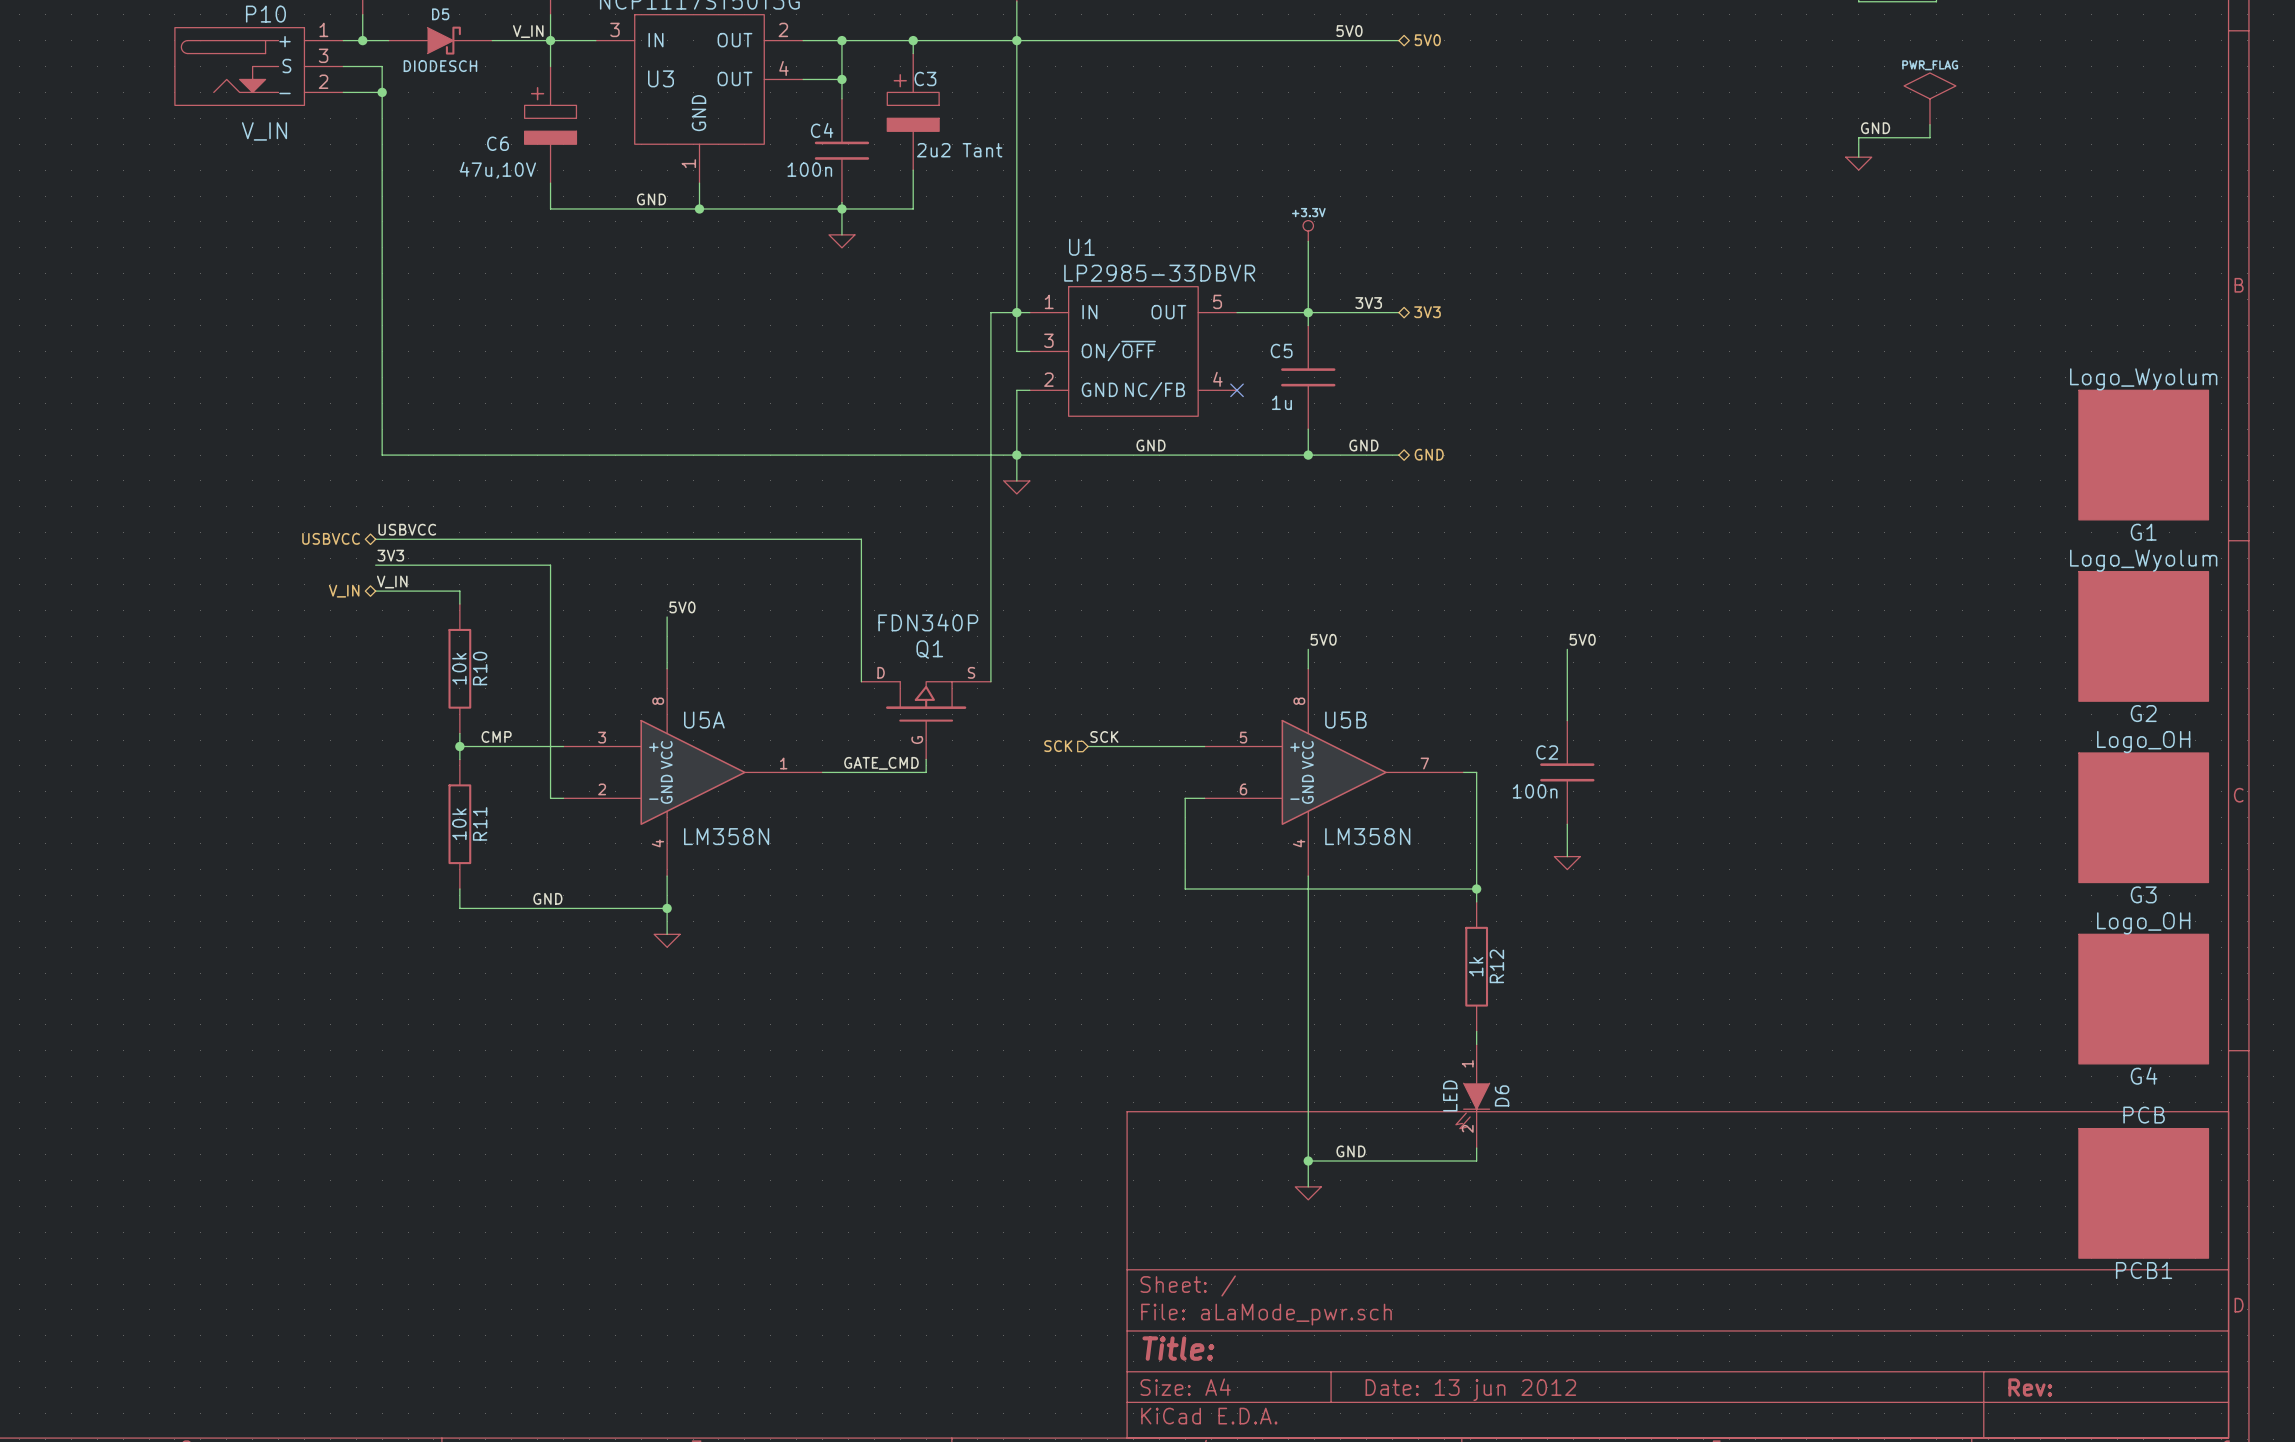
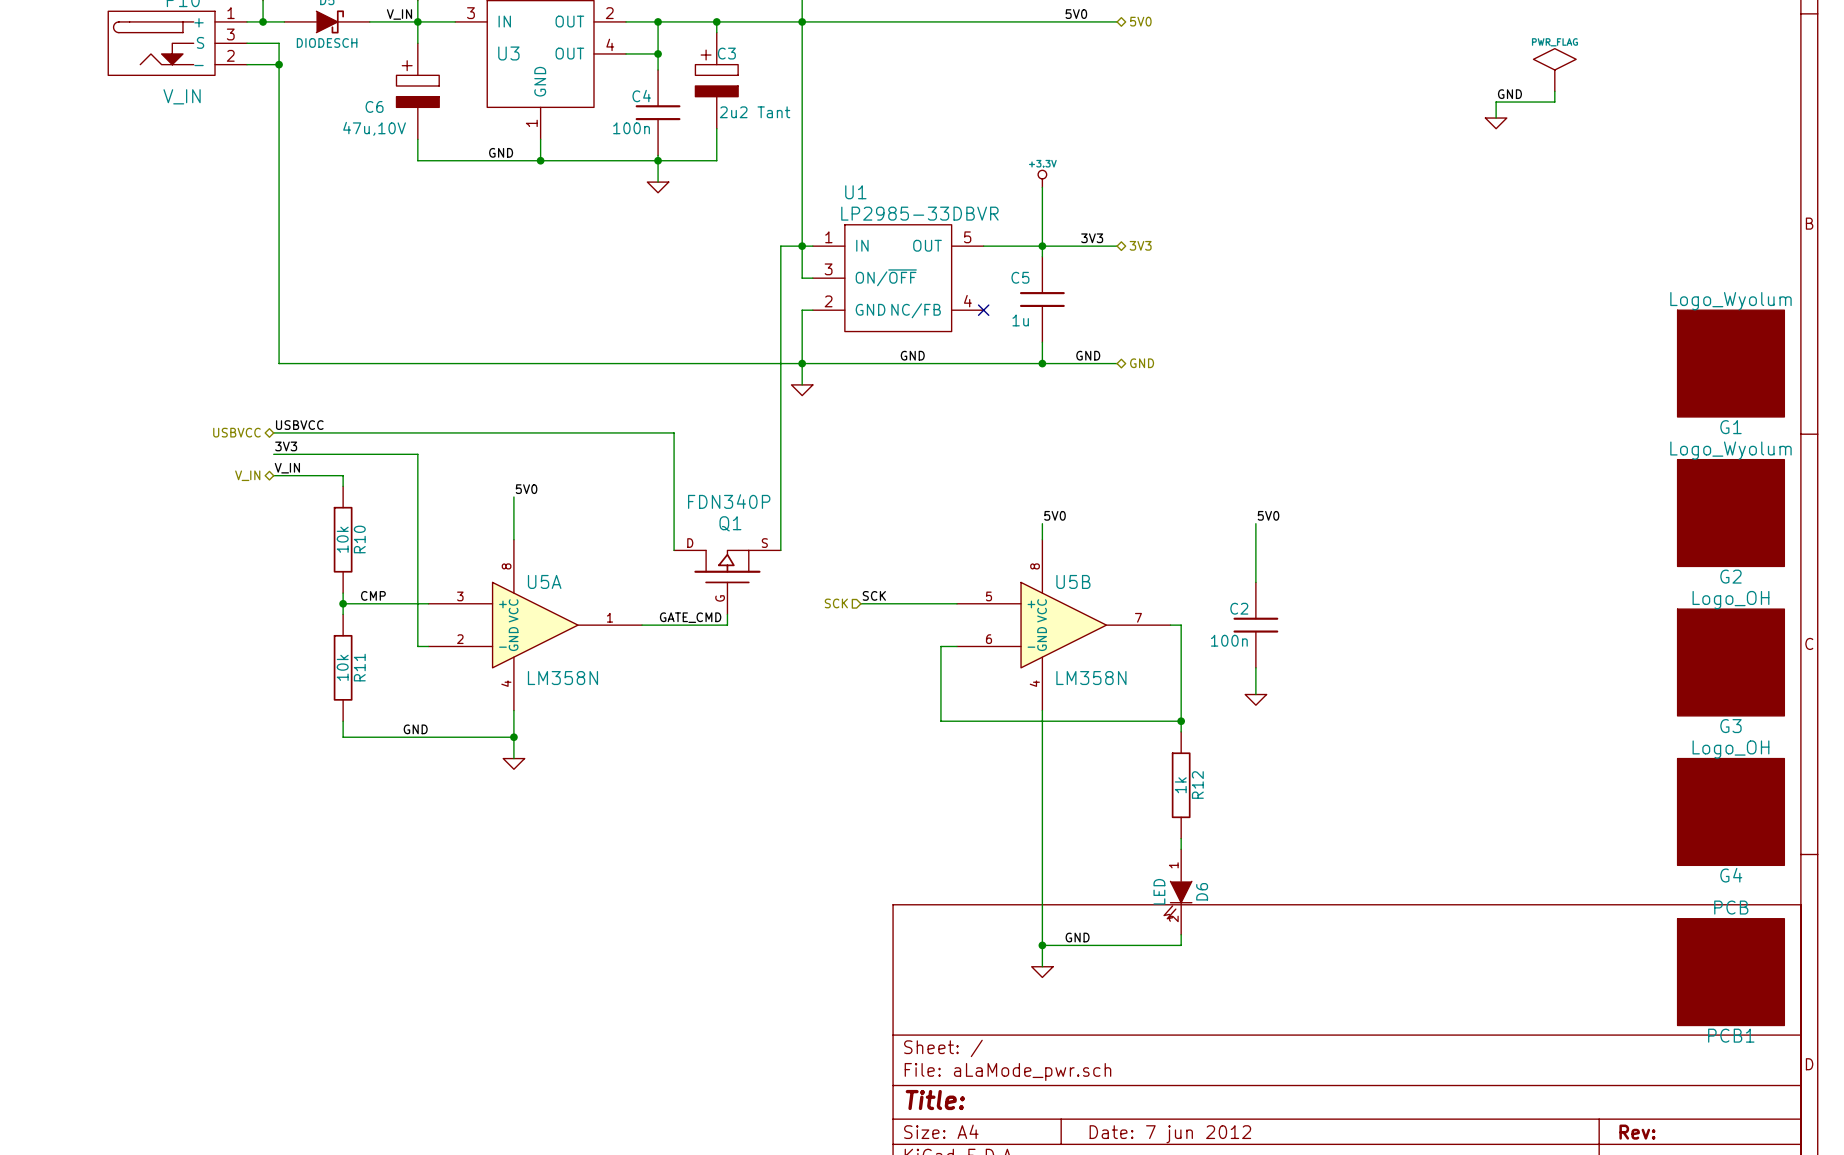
title block: Date: 13 jun 2012 (1470, 1390) -> Date: 7 jun 2012 (1170, 1134)

